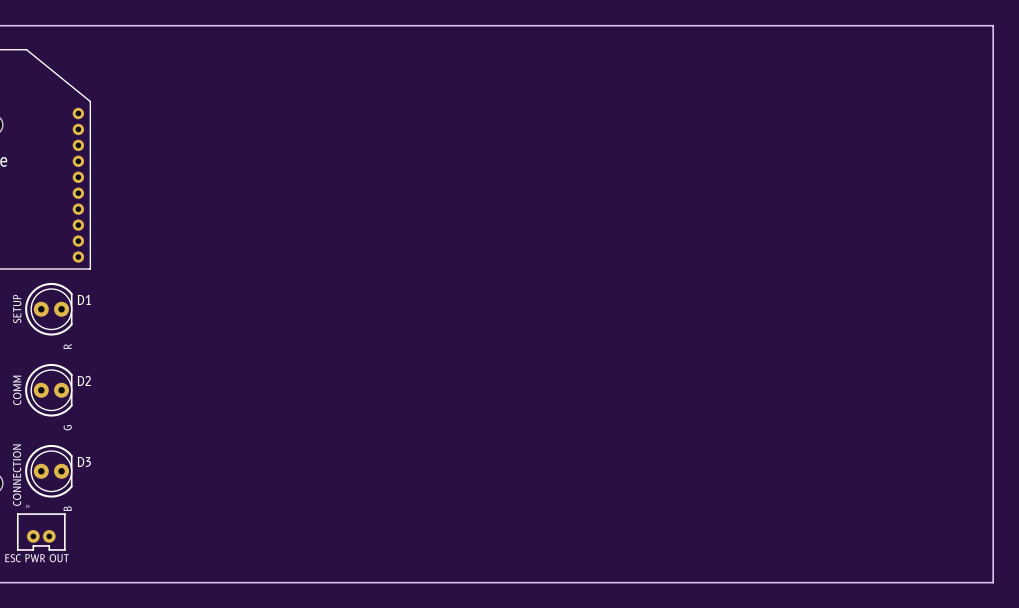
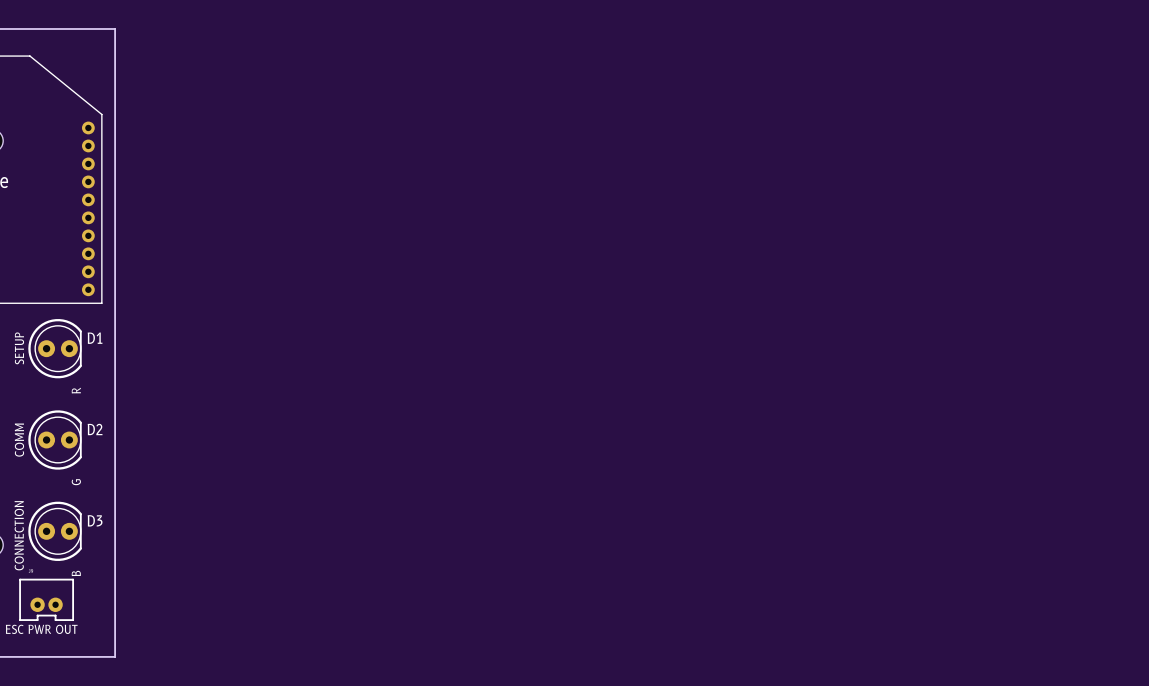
board edge: (102, 25) (993, 25) (993, 582) (102, 582) -> (115, 28) (115, 656)

